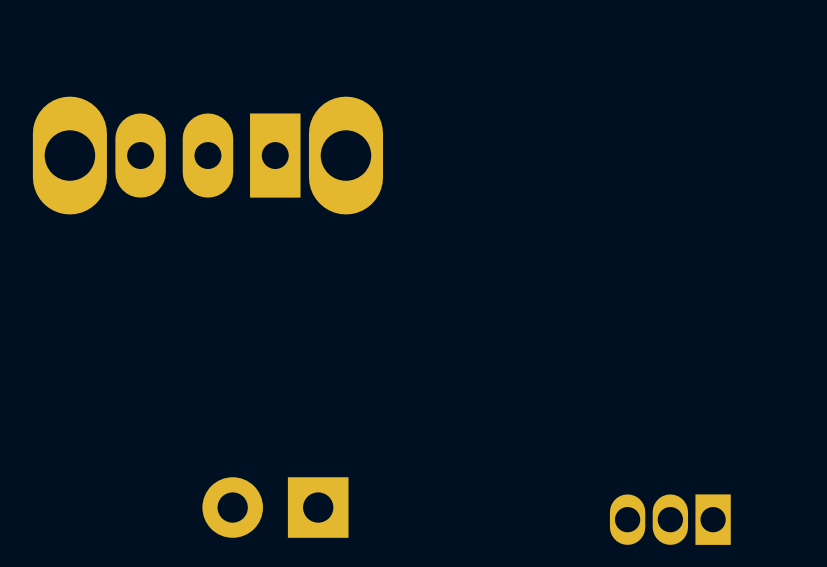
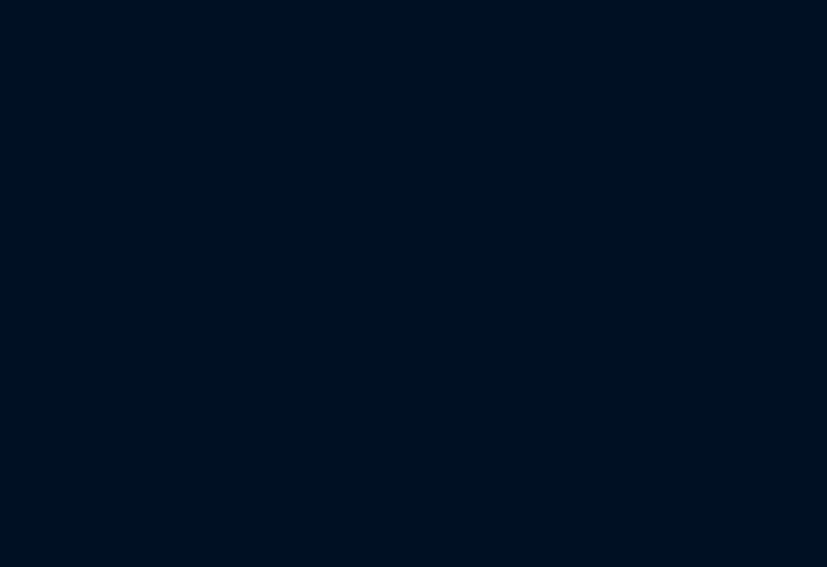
part: (207, 155) -> none
part: (275, 507) -> none
part: (670, 519) -> none

